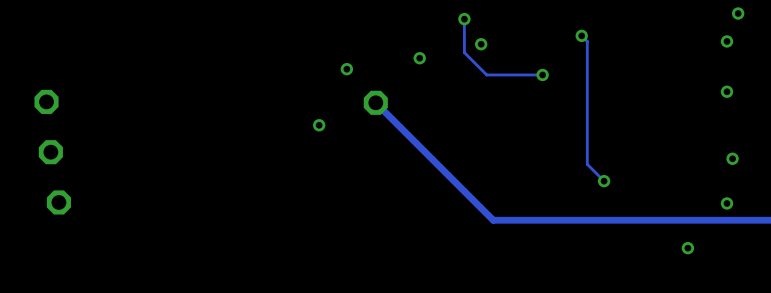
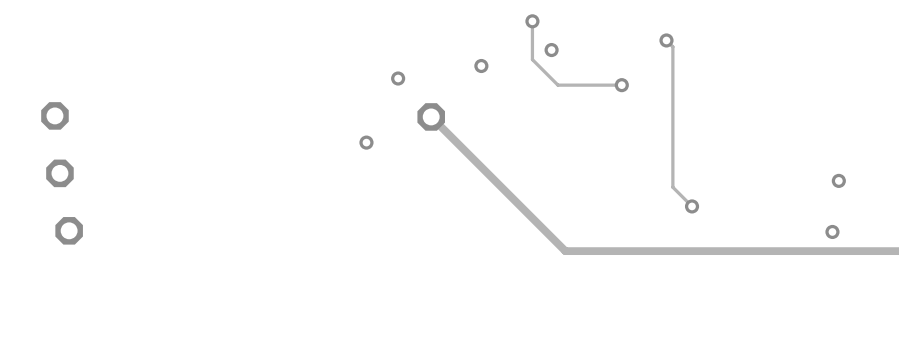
via: (738, 13) -> none
via: (726, 41) -> none
via: (726, 91) -> none
via: (687, 248) -> none

